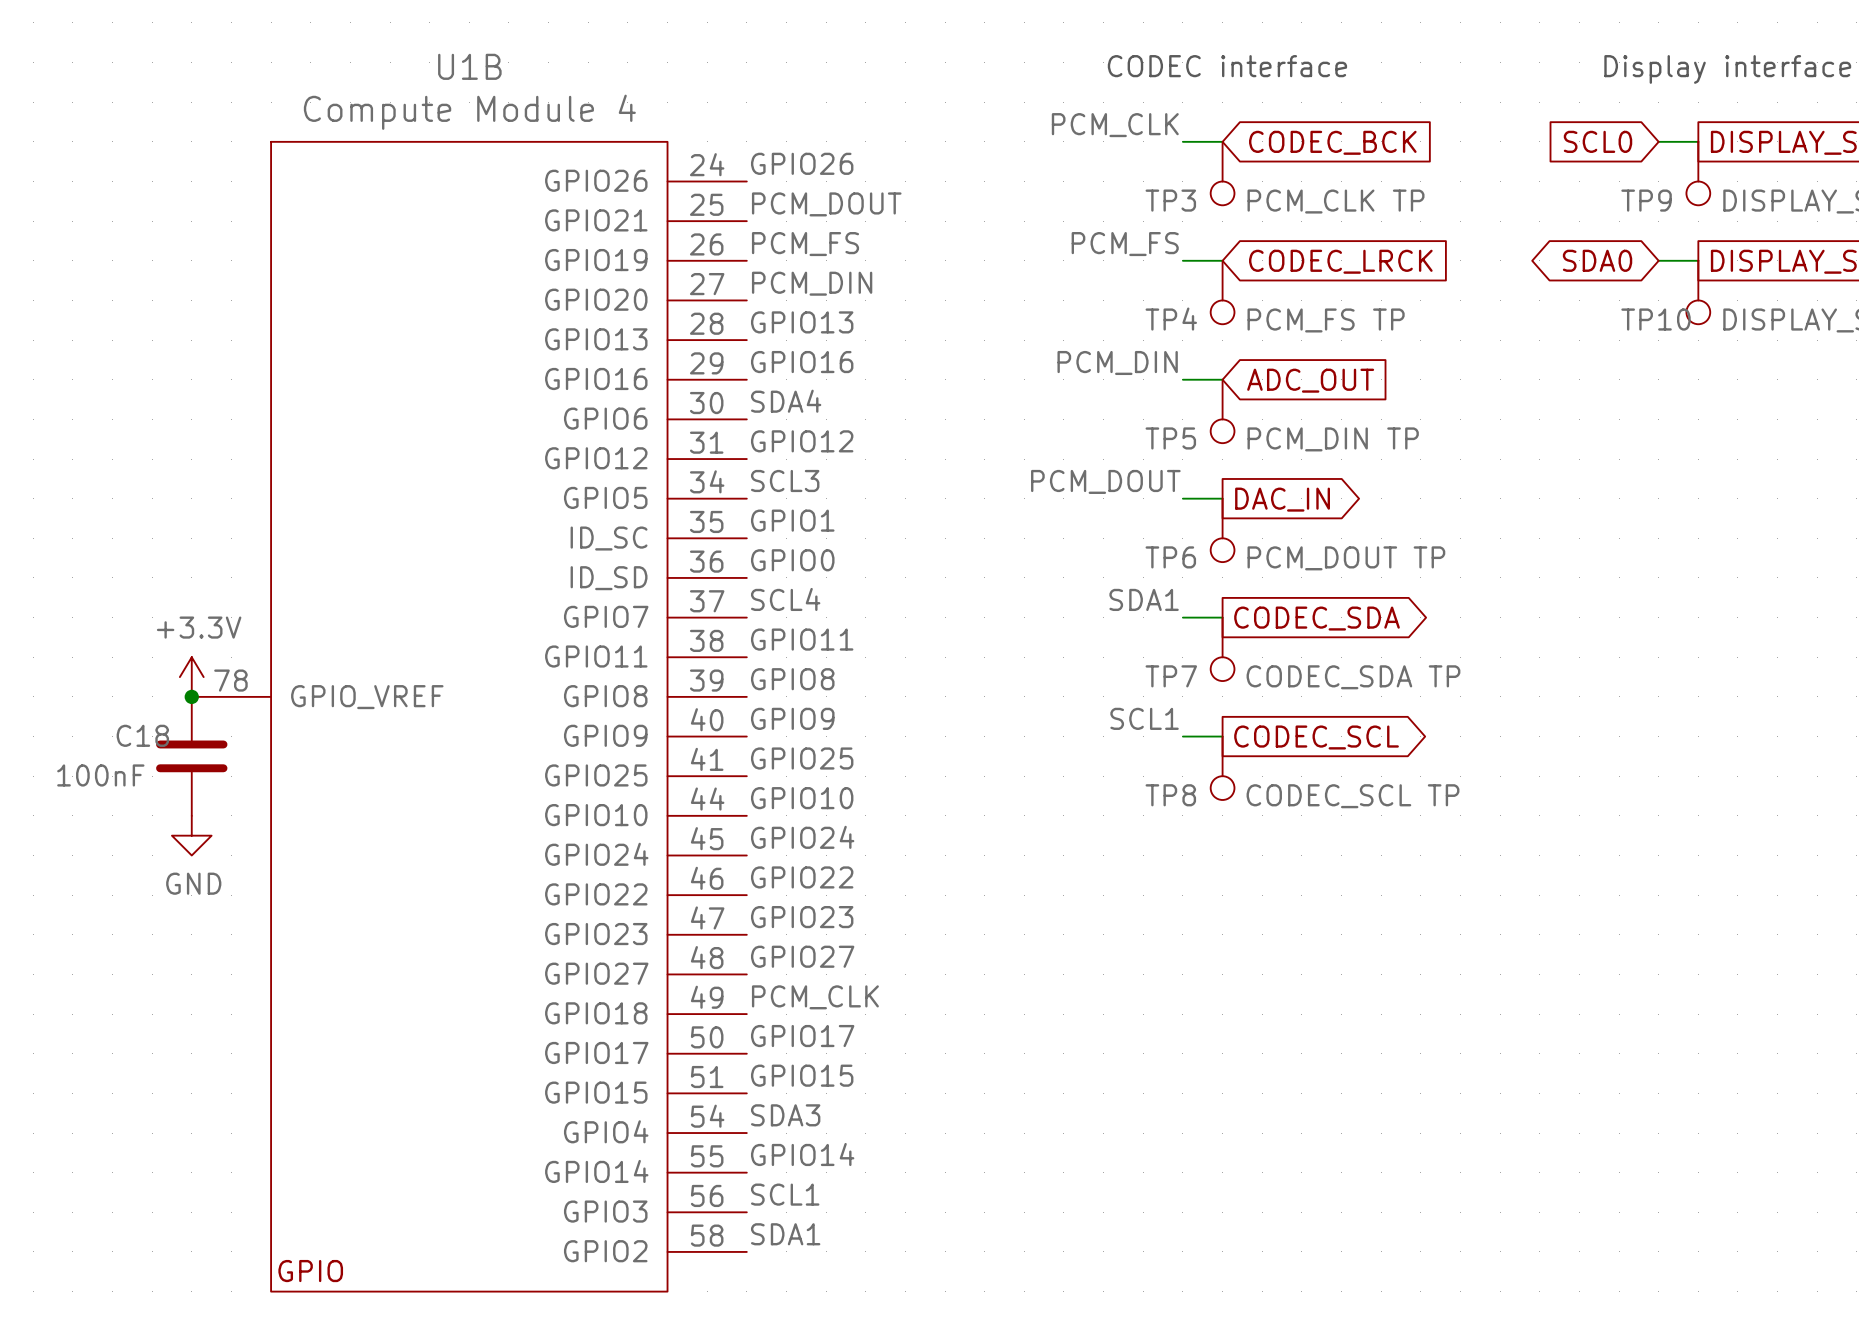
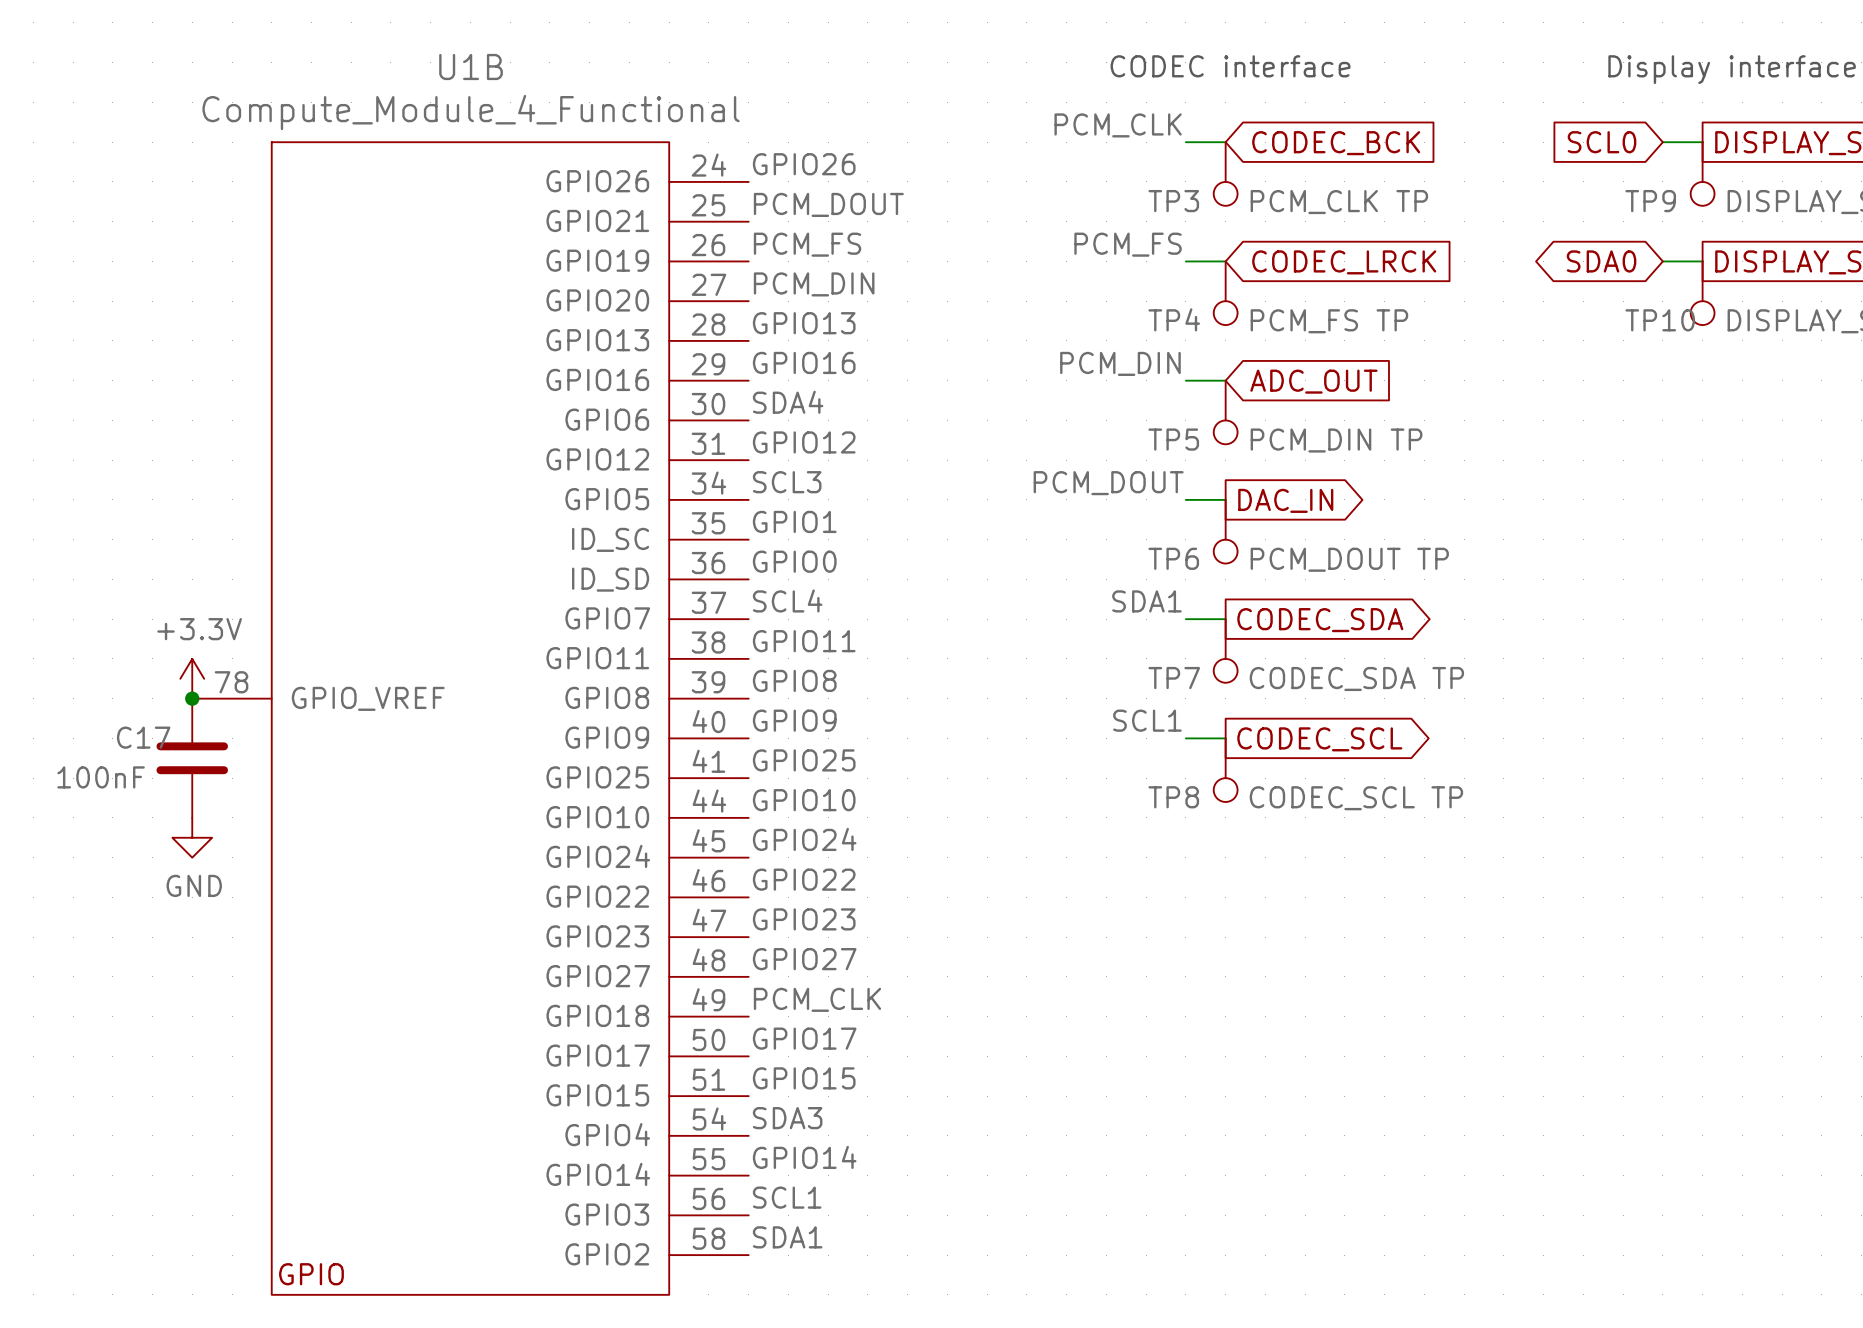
U1B value: Compute Module 4 (469, 112) -> Compute_Module_4_Functional (471, 112)
C18 name: C18 (142, 735) -> C17 (143, 737)

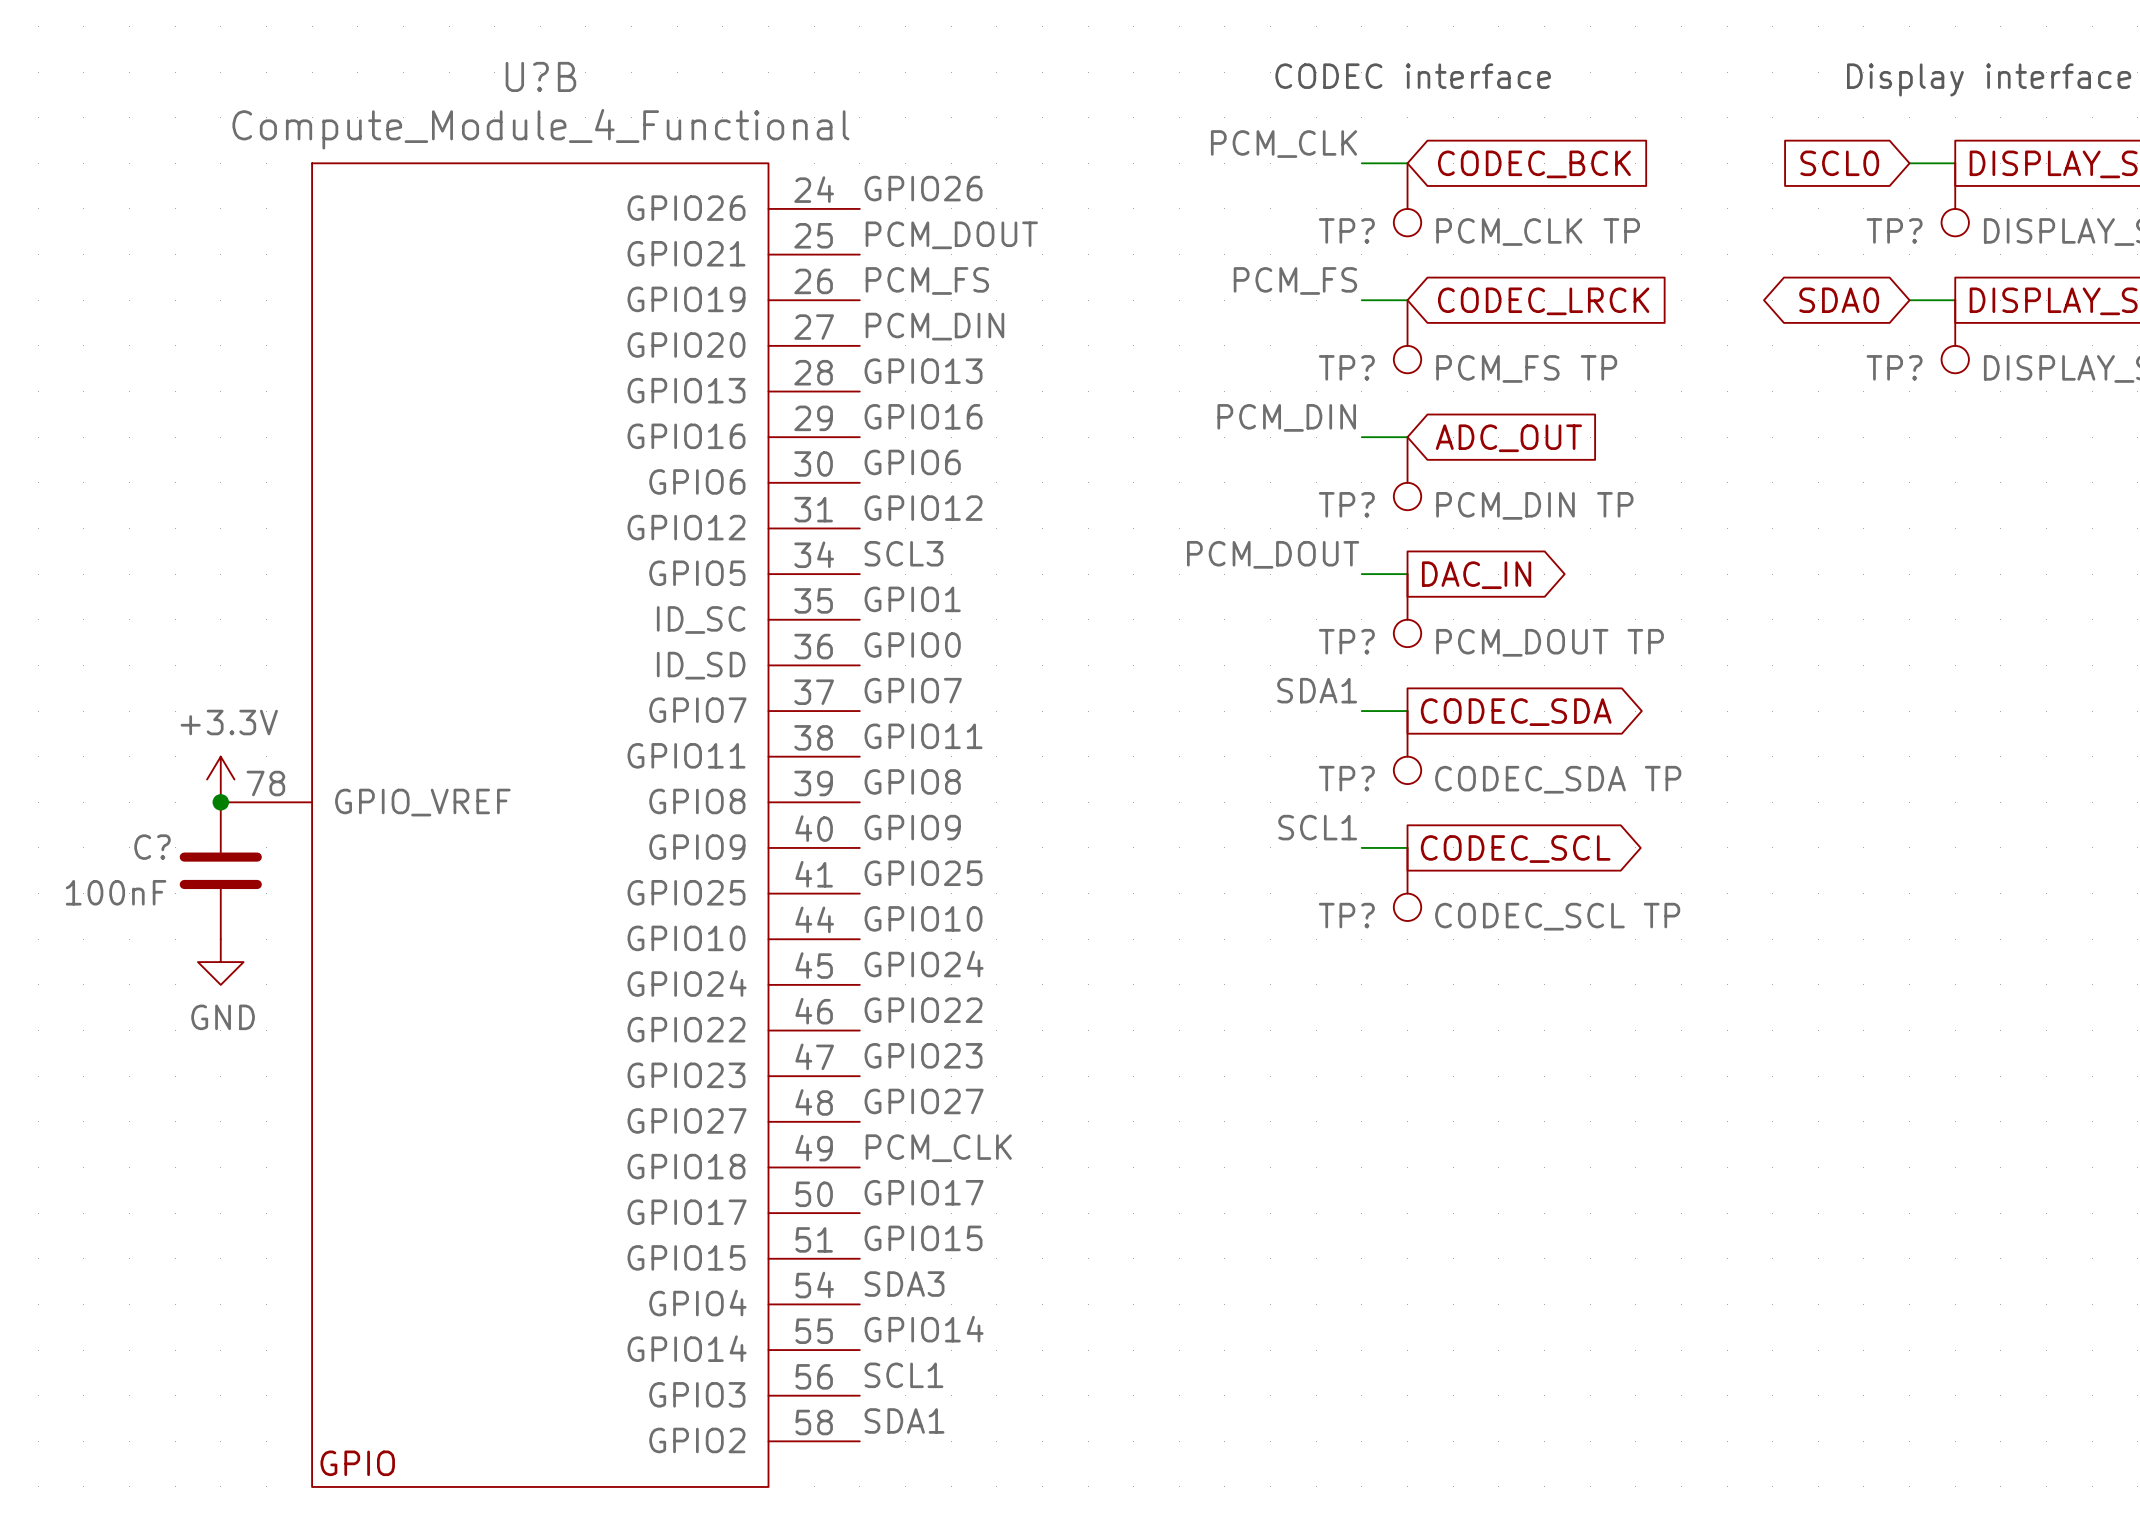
U1B name: U1B (471, 66) -> U?B (540, 76)
TP3 name: TP3 (1173, 201) -> TP? (1346, 230)
TP9 name: TP9 (1650, 201) -> TP? (1894, 230)
TP4 name: TP4 (1174, 319) -> TP? (1346, 367)
TP10 name: TP10 (1660, 320) -> TP? (1894, 367)
label: SDA4 (788, 402) -> GPIO6 (912, 462)
TP5 name: TP5 (1173, 439) -> TP? (1346, 504)
TP6 name: TP6 (1173, 558) -> TP? (1346, 641)
label: SCL4 (787, 600) -> GPIO7 (913, 690)
TP7 name: TP7 (1174, 678) -> TP? (1346, 778)
C17 name: C17 (143, 737) -> C? (152, 847)
TP8 name: TP8 (1173, 797) -> TP? (1346, 915)

